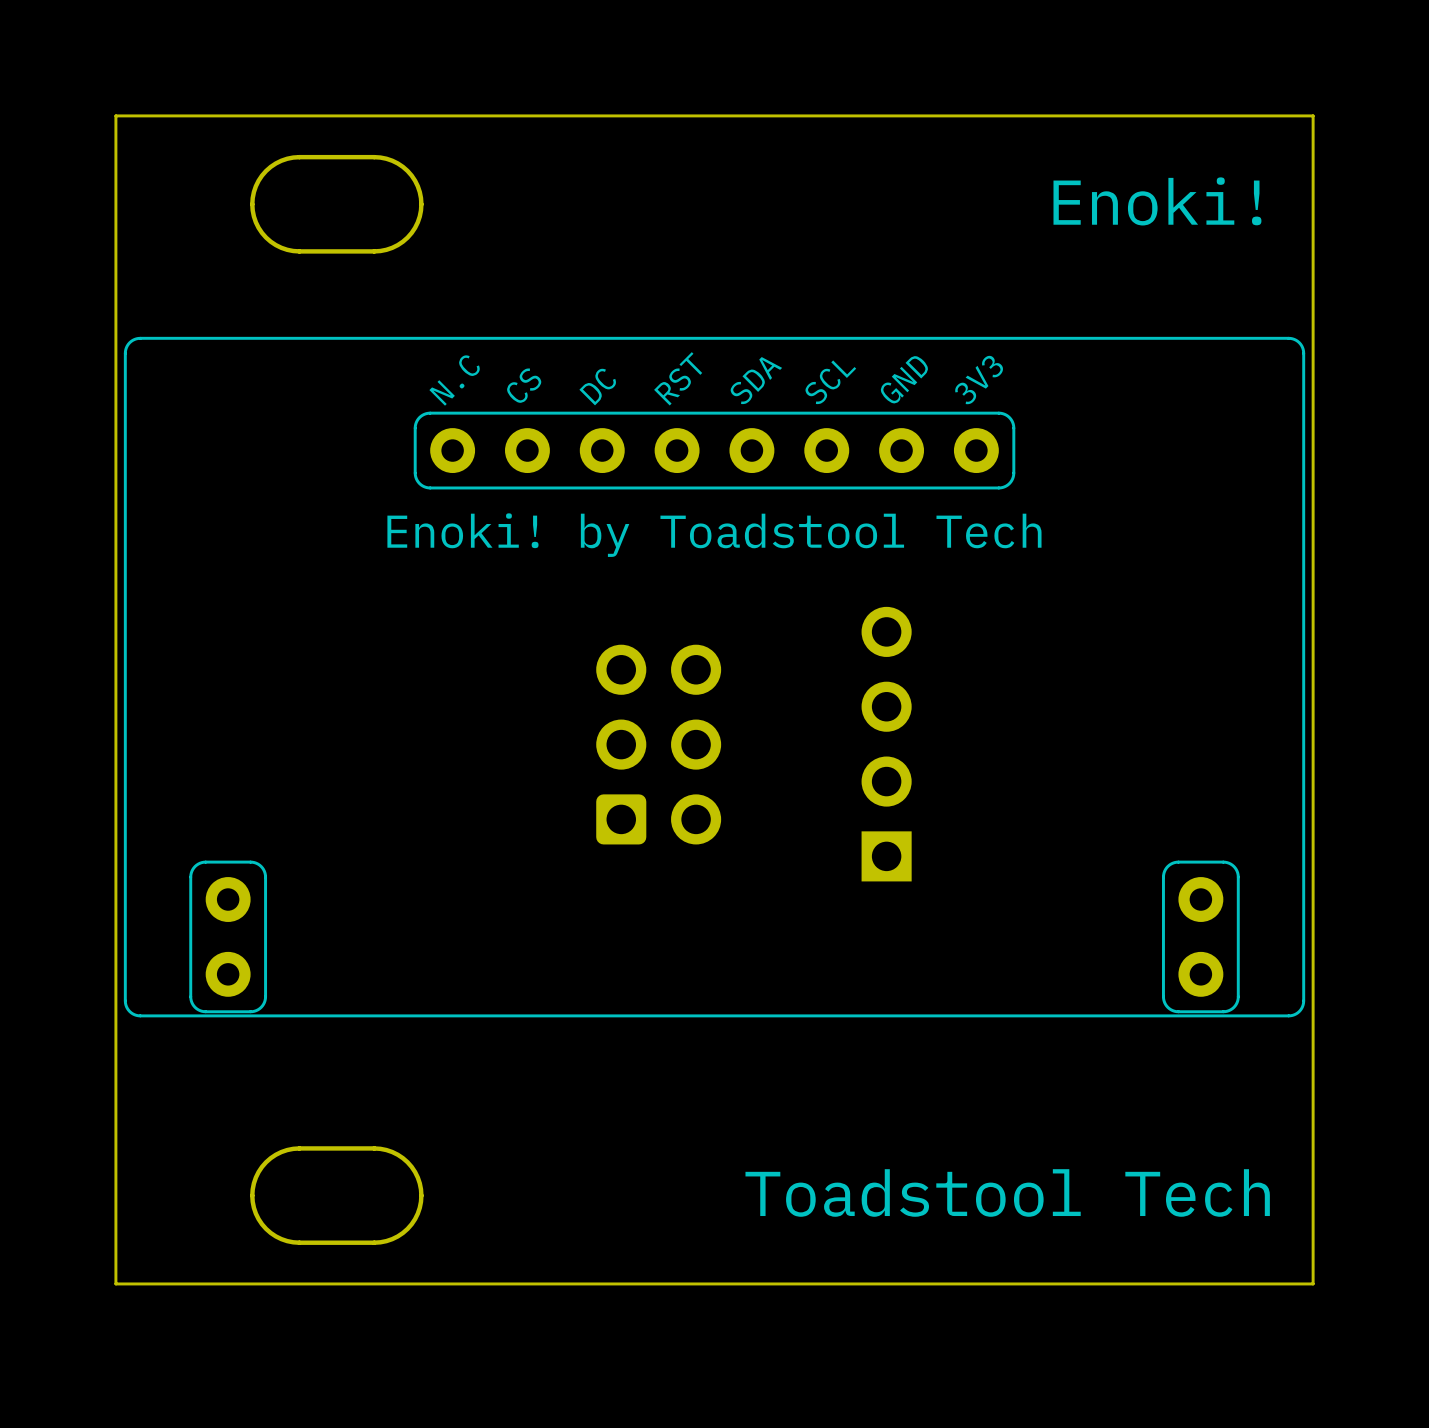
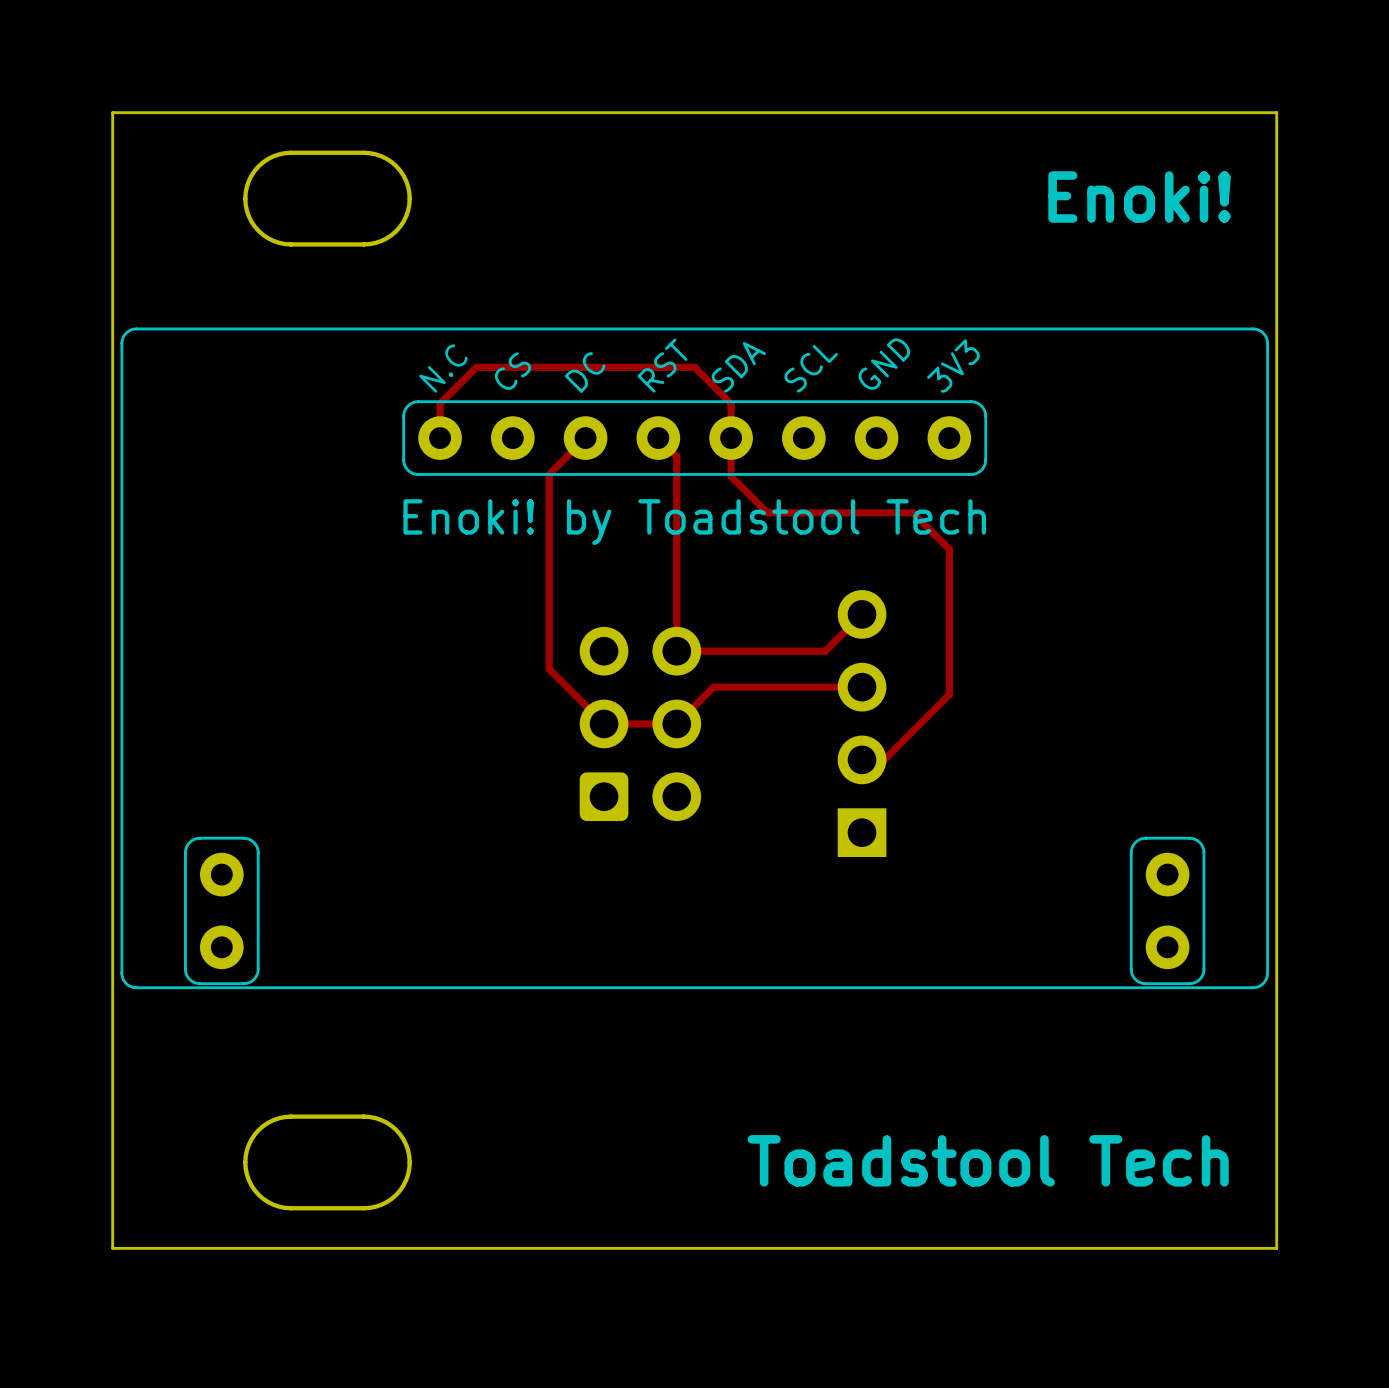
top track: none -> (440, 438) (440, 403) (476, 367) (694, 367) (731, 403) (731, 476) (767, 512) (912, 512) (949, 549) (949, 694) (884, 759) (862, 759)
top track: none -> (585, 438) (549, 474) (549, 669) (604, 723) (676, 723) (713, 687) (862, 687)
top track: none -> (658, 438) (676, 456) (676, 651) (825, 651) (862, 614)

